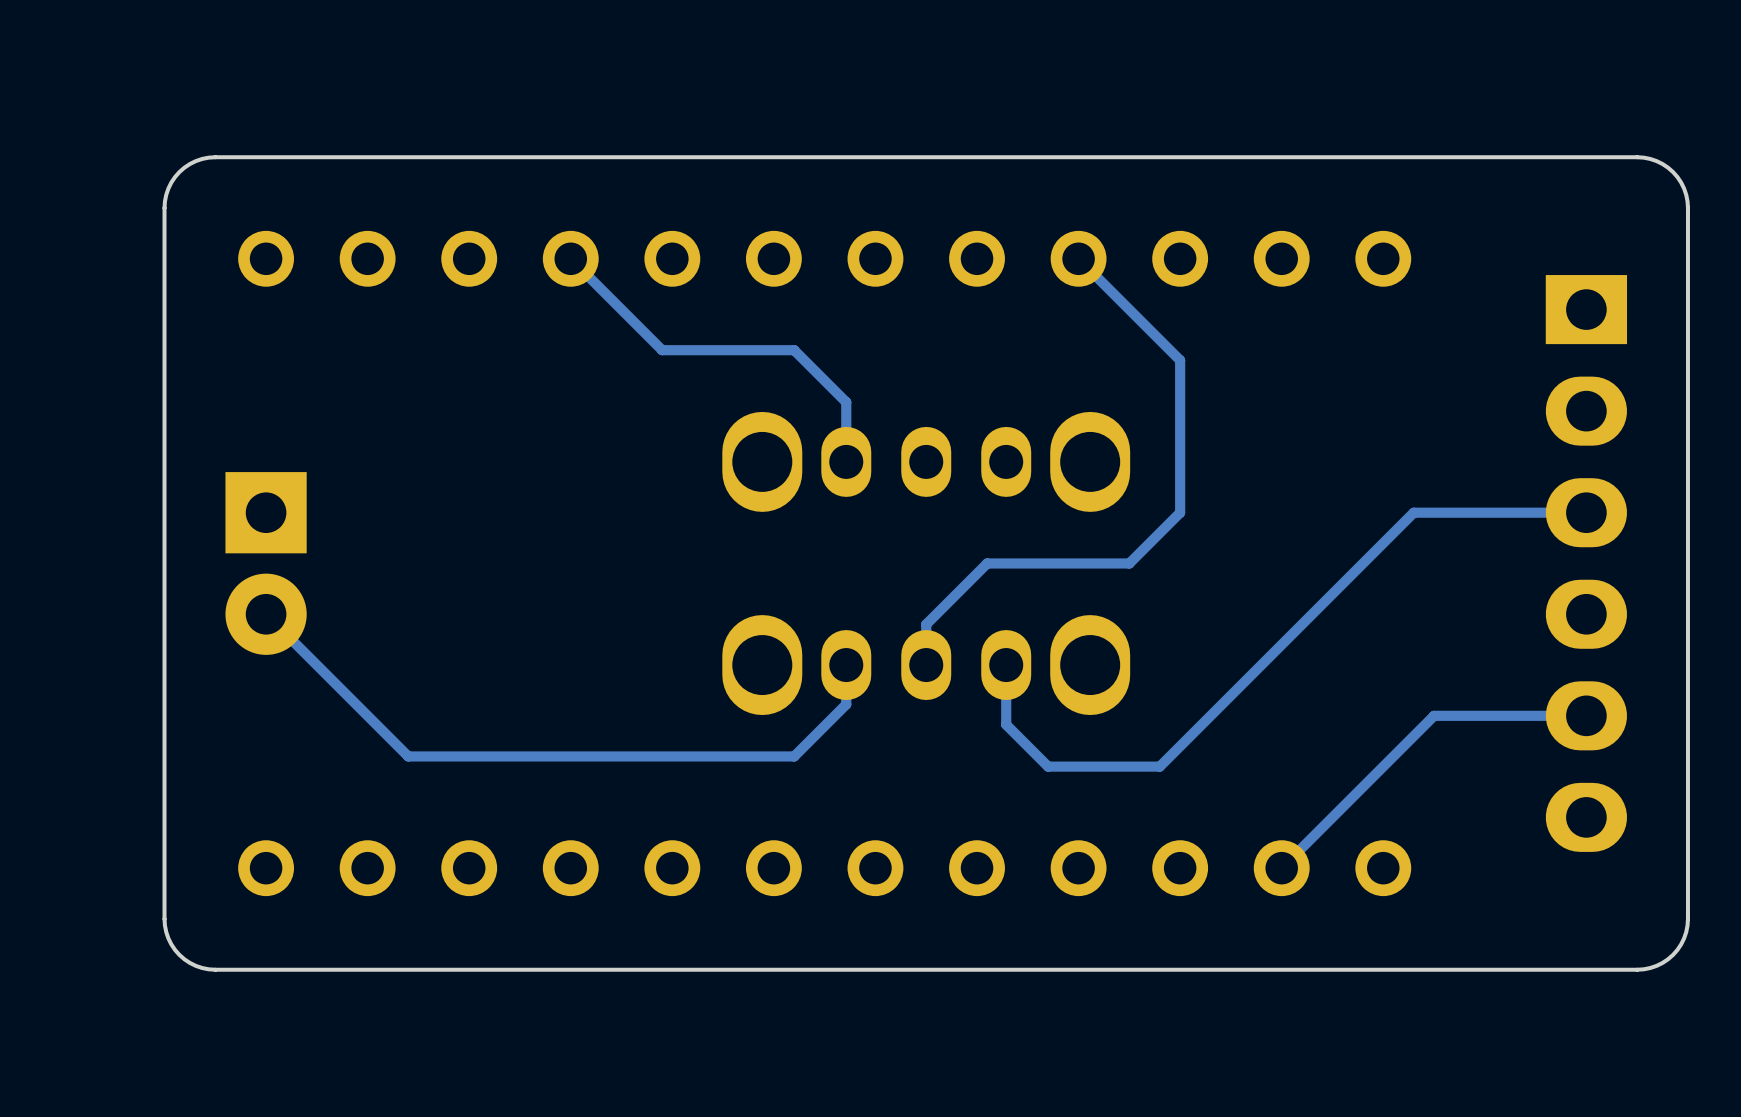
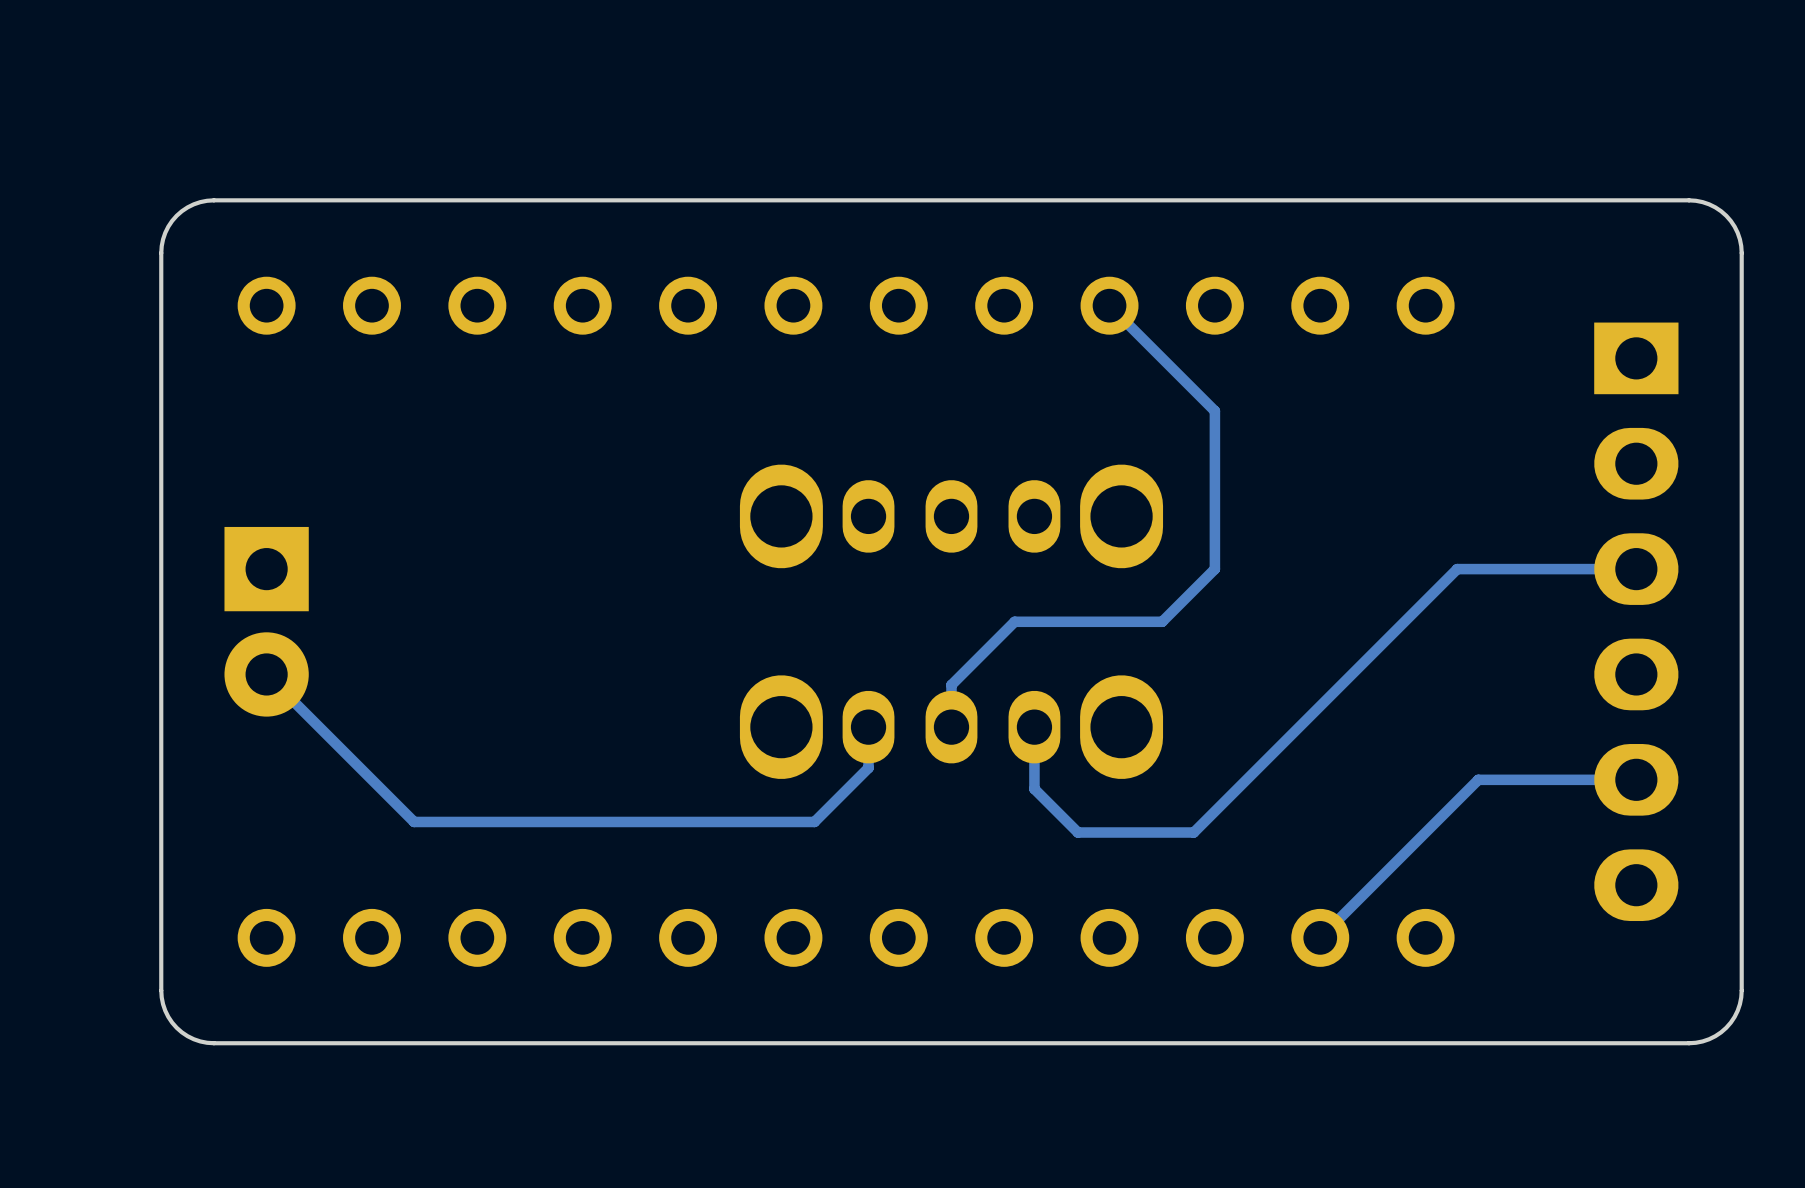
track: (570, 258) (662, 350) (794, 350) (846, 402) (846, 461) -> none

